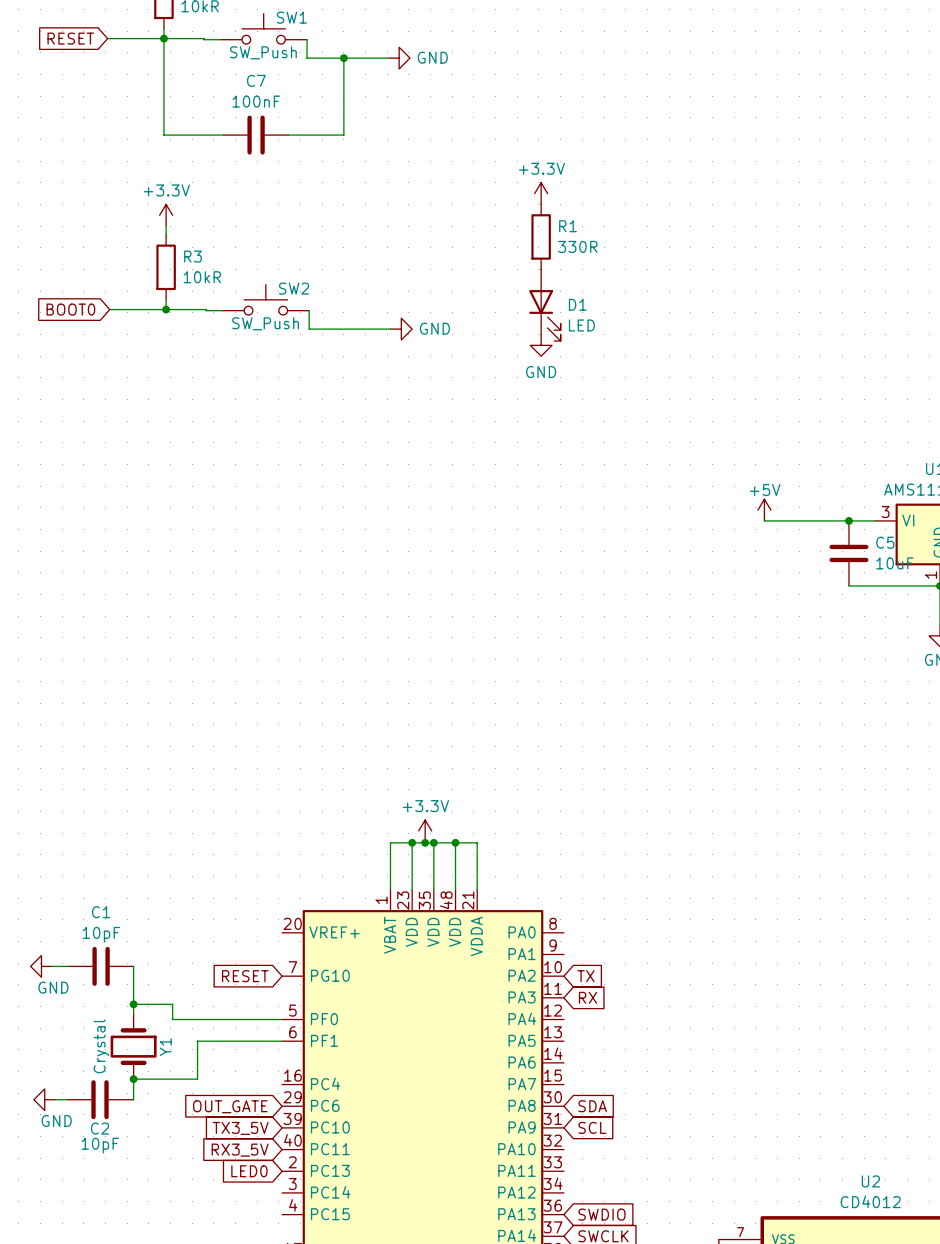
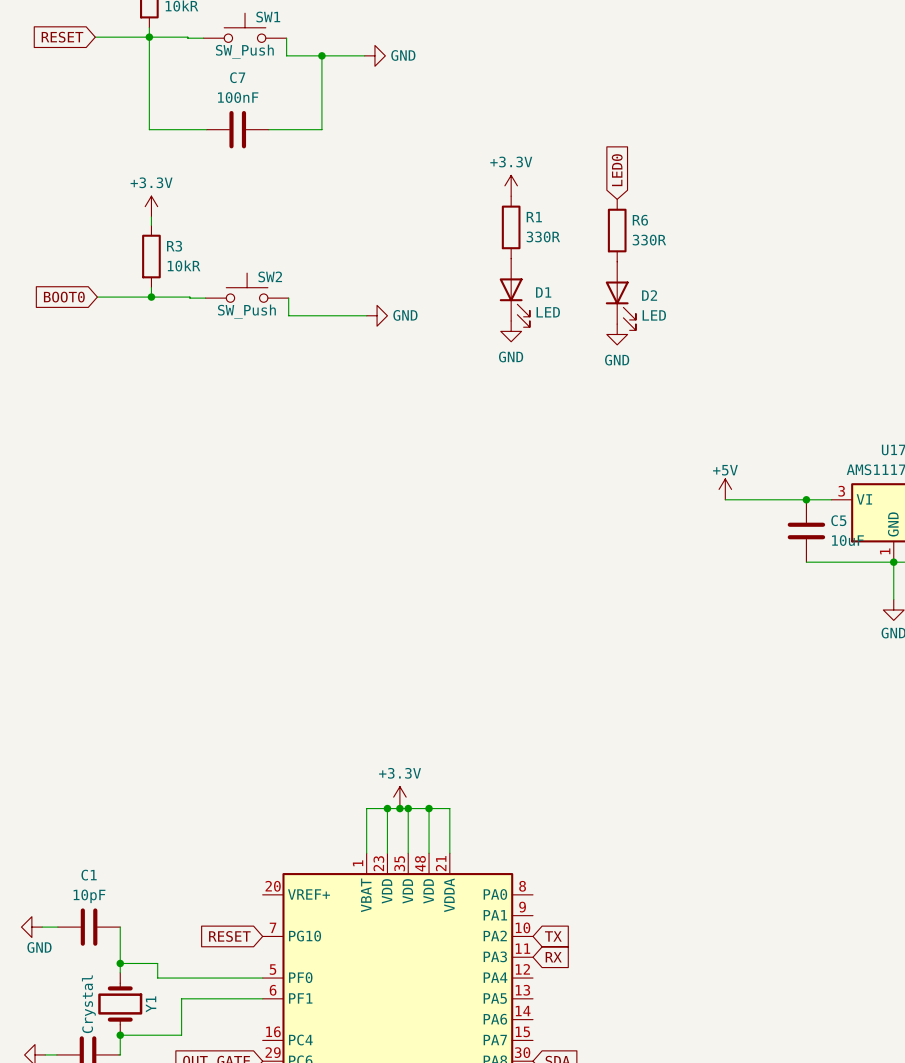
global label: none -> LED0 (617, 170)
R6: none -> 330R (617, 230)
D2: none -> LED (620, 296)
power symbol: none -> GND (617, 334)

